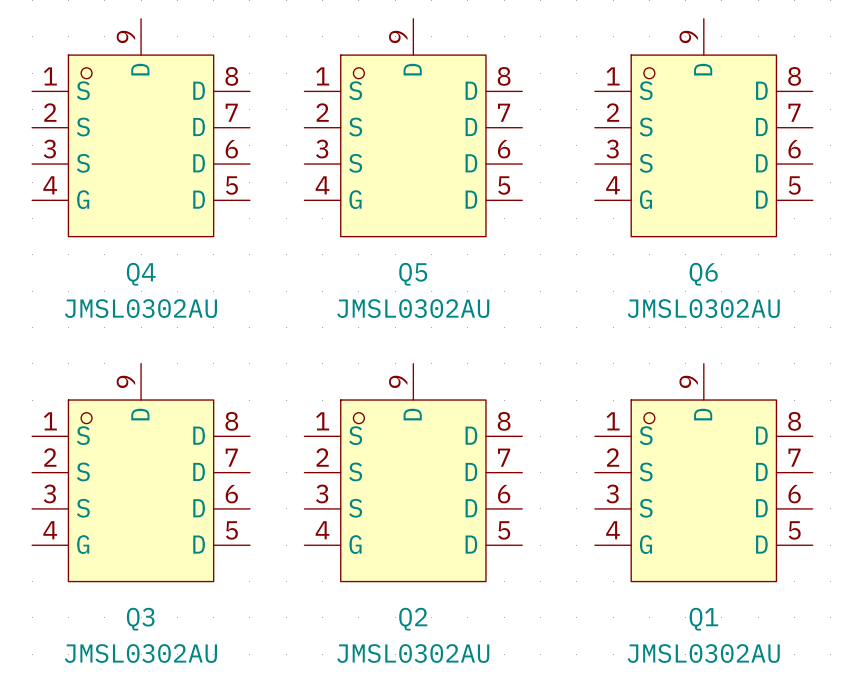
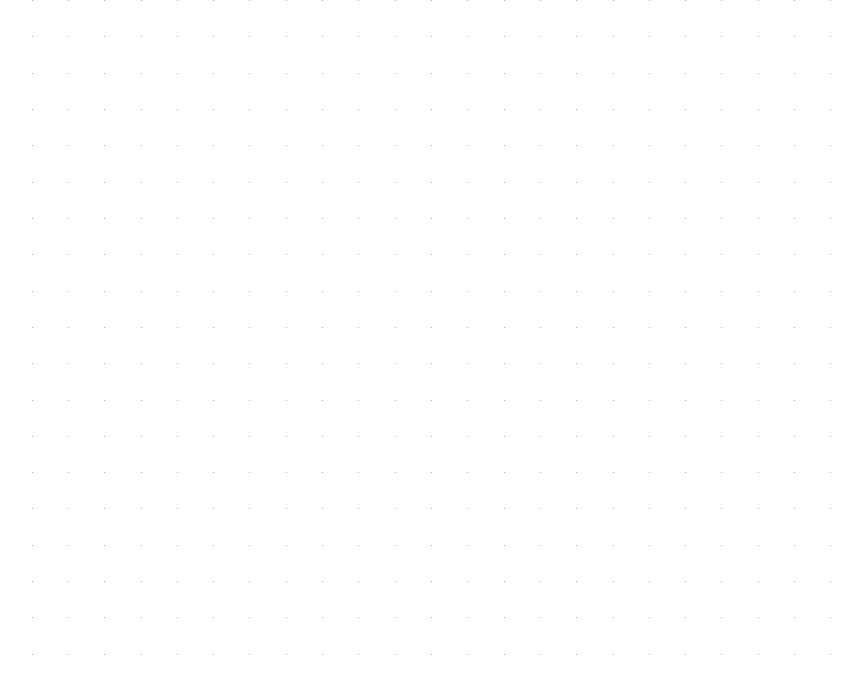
Q4: JMSL0302AU (141, 127) -> none
Q5: JMSL0302AU (413, 127) -> none
Q6: JMSL0302AU (703, 127) -> none
Q3: JMSL0302AU (141, 472) -> none
Q2: JMSL0302AU (413, 472) -> none
Q1: JMSL0302AU (703, 472) -> none

